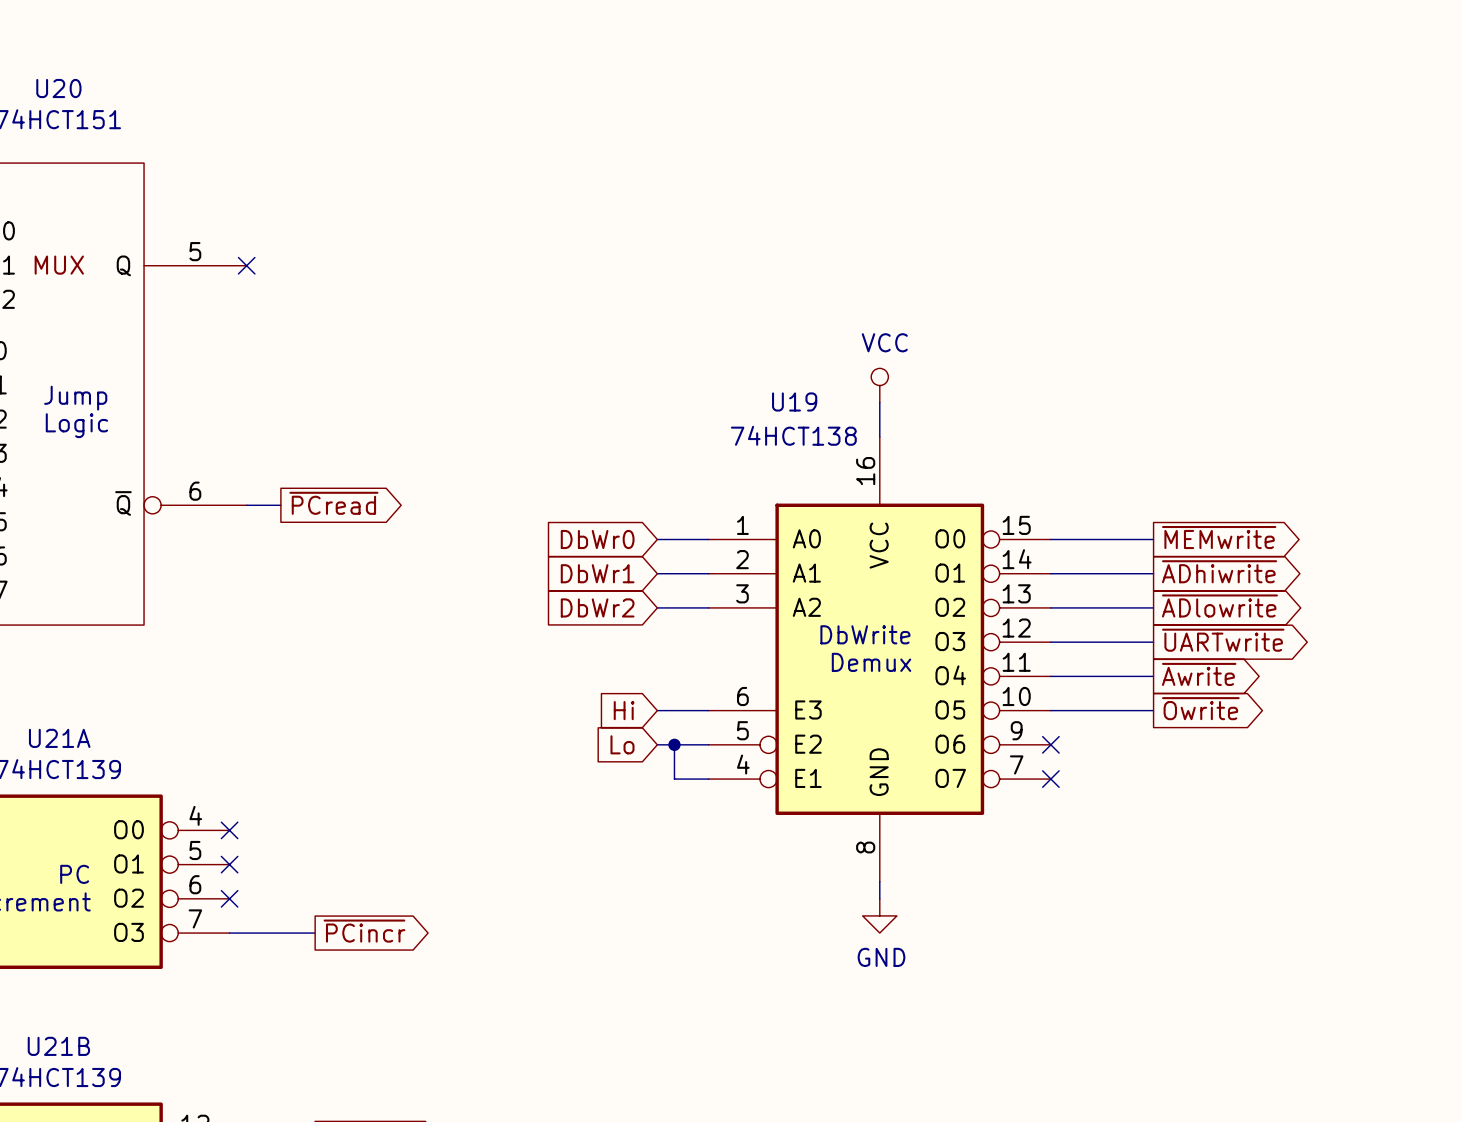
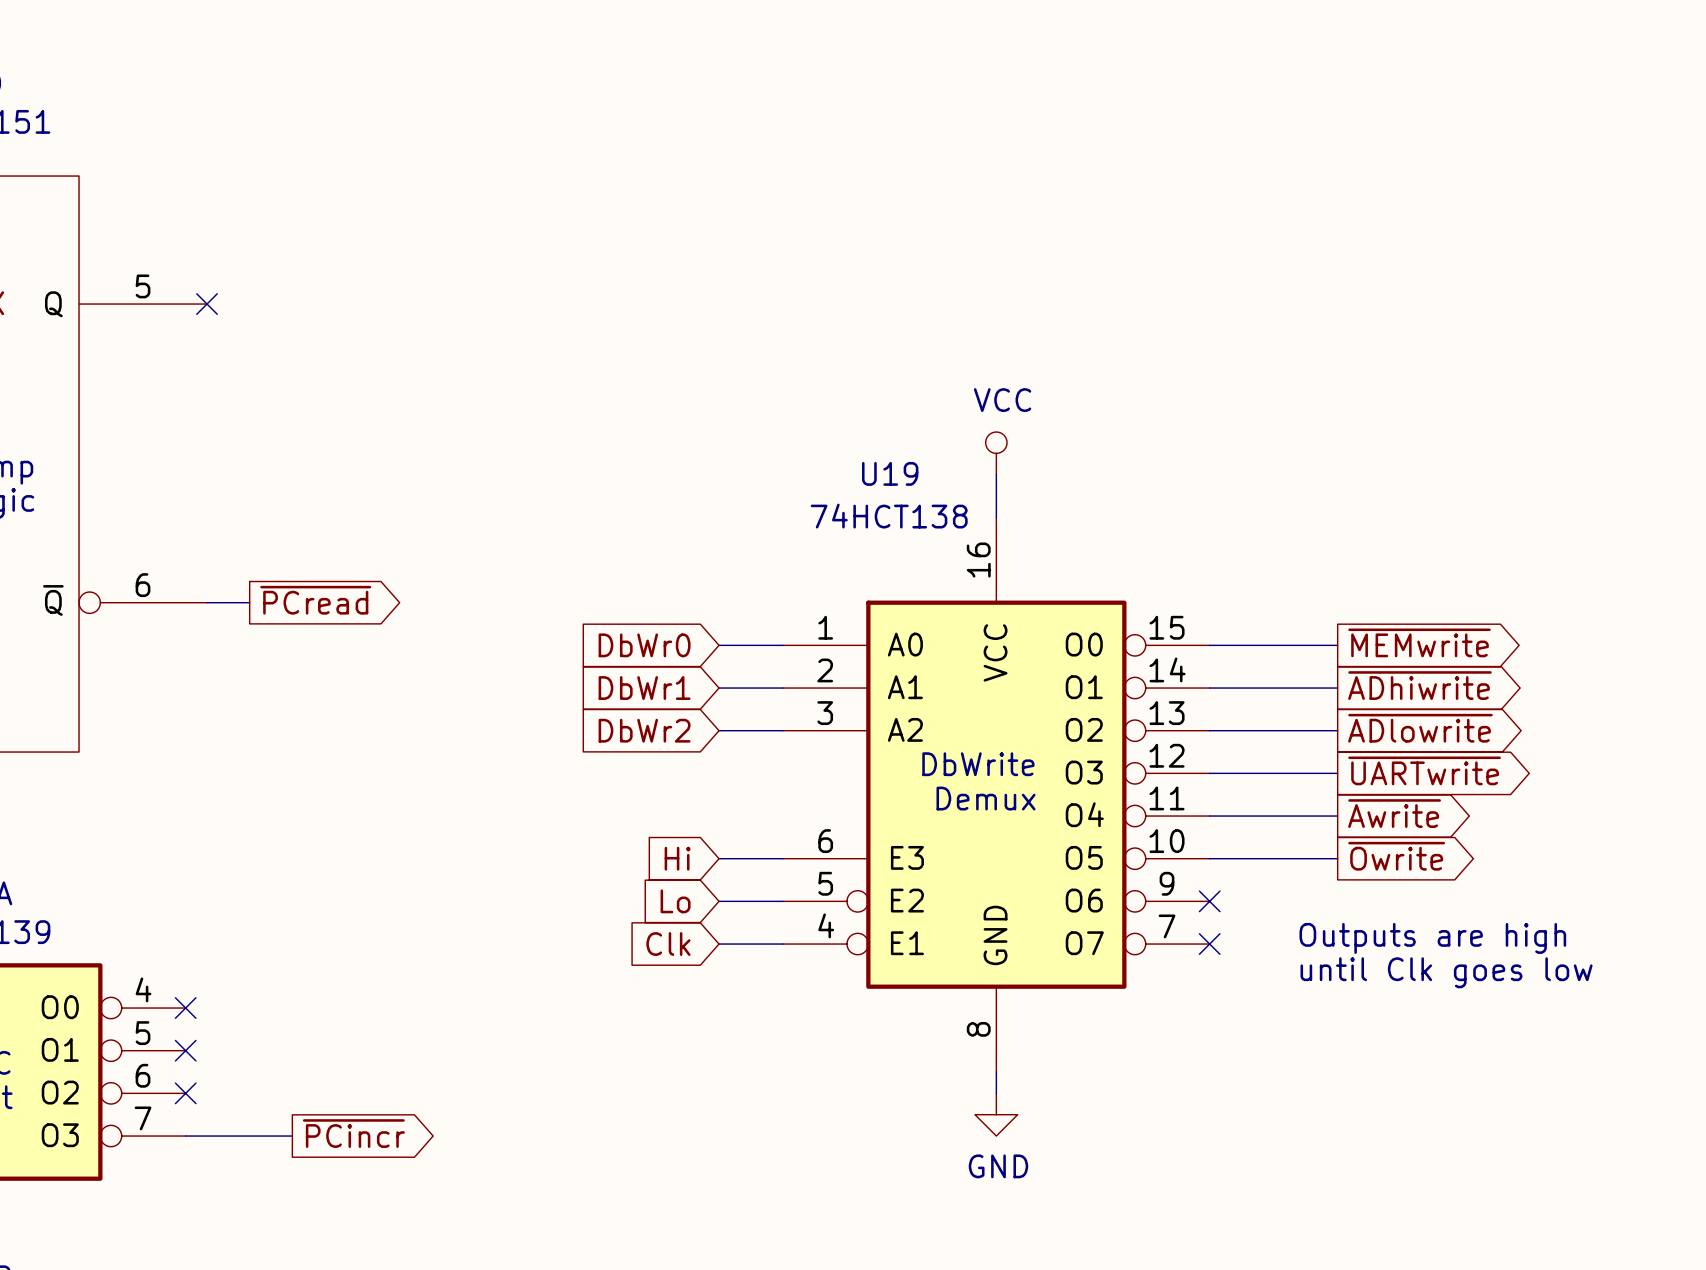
wire: (674, 744) (674, 779) -> (719, 944) (740, 944)
junction: (674, 744) -> none
text: none -> Outputs are high (1432, 938)
global label: none -> Clk (668, 944)
text: none -> until Clk goes low (1446, 972)

